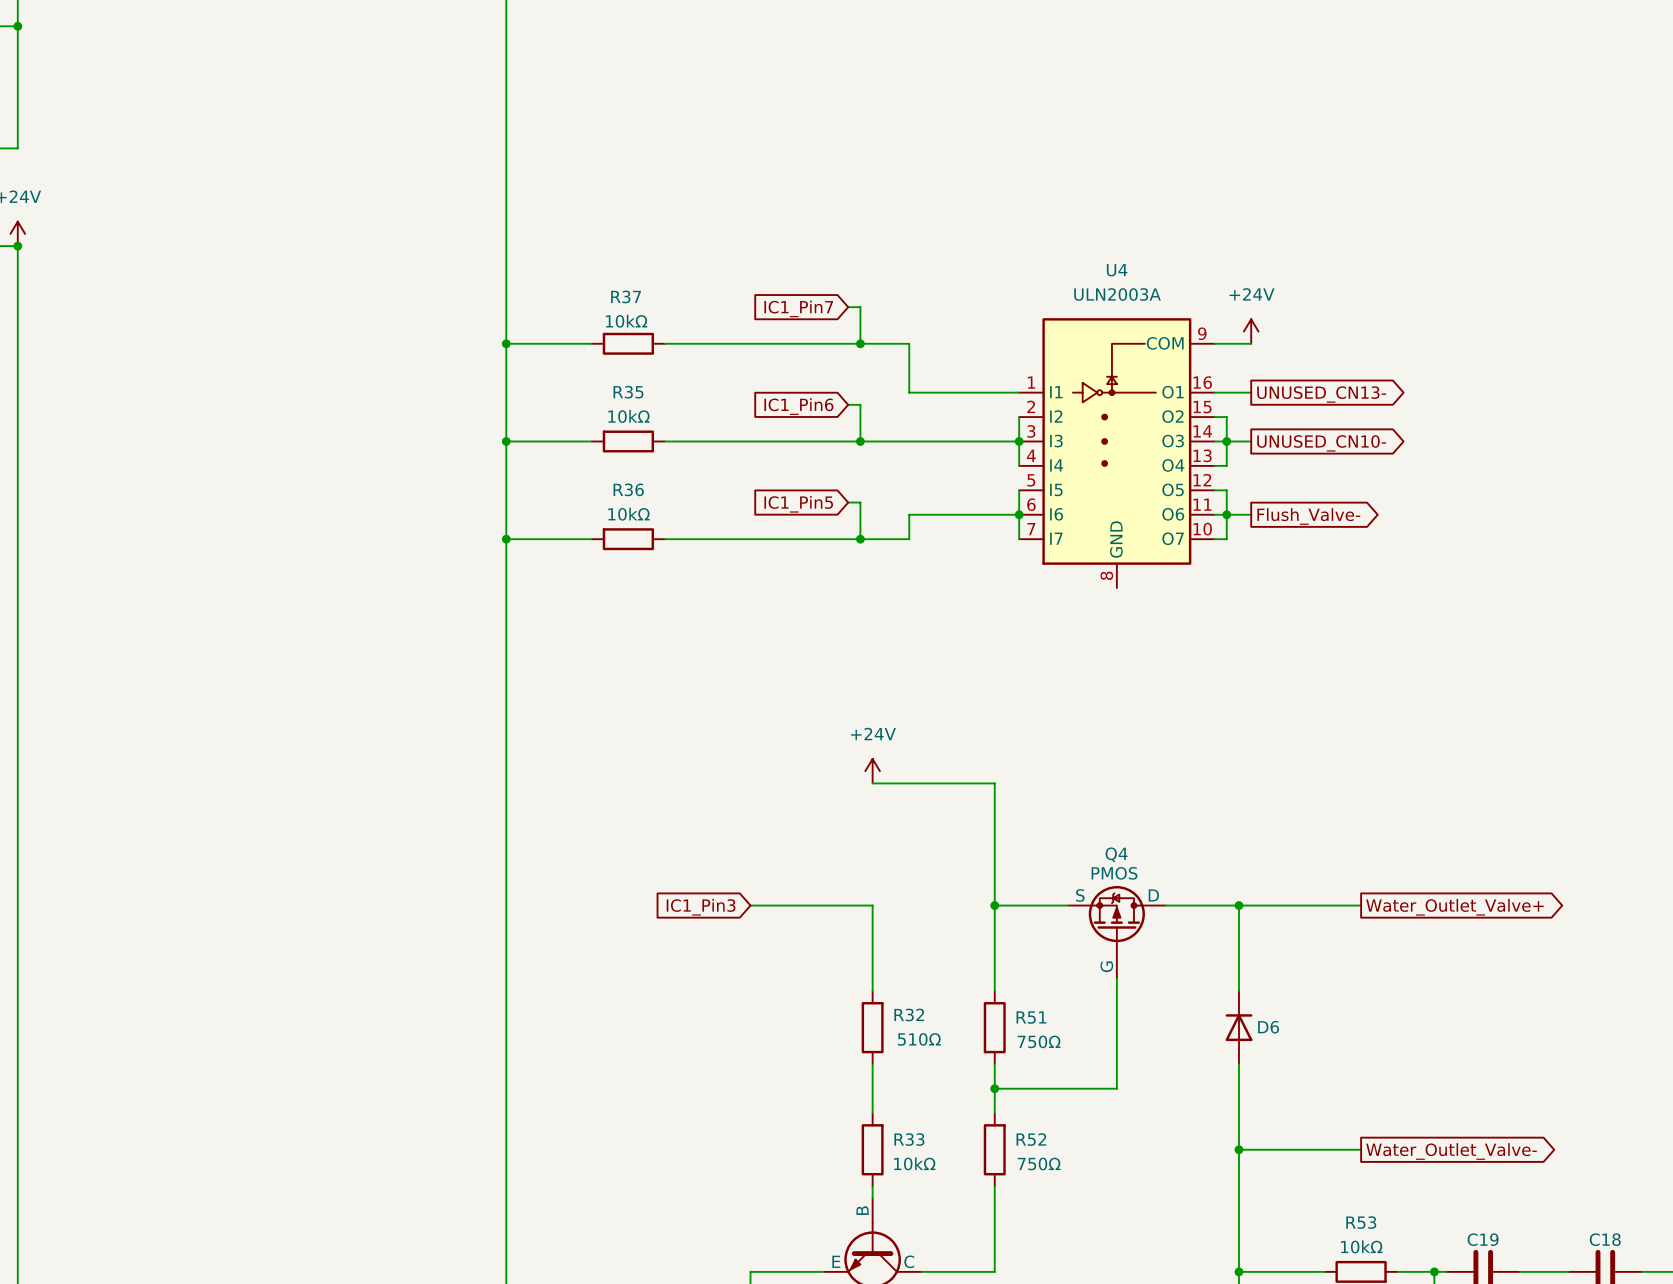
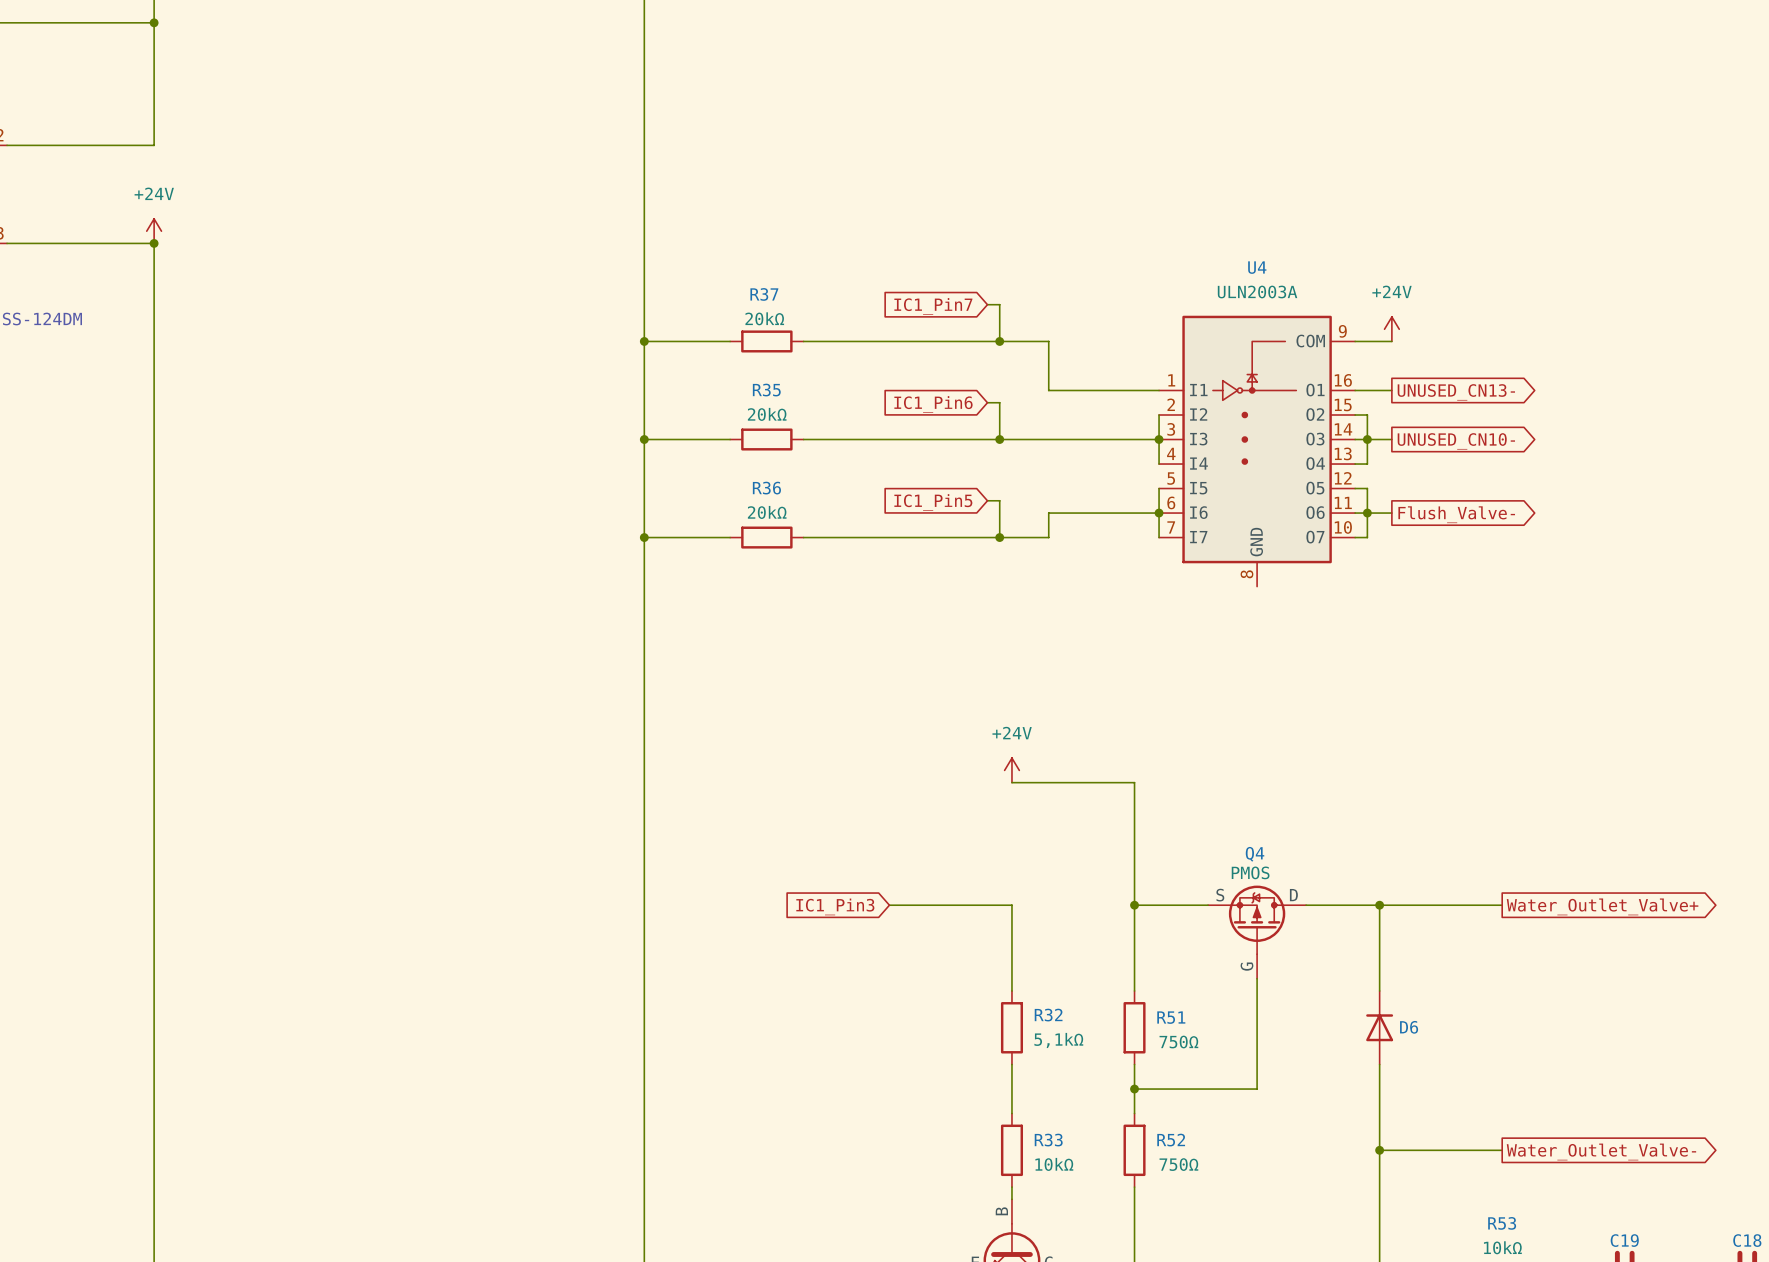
R37 value: 10kΩ (626, 321) -> 20kΩ (764, 318)
R35 value: 10kΩ (628, 416) -> 20kΩ (767, 414)
R36 value: 10kΩ (628, 514) -> 20kΩ (767, 512)
R32 value: 510Ω (919, 1039) -> 5,1kΩ (1058, 1040)

